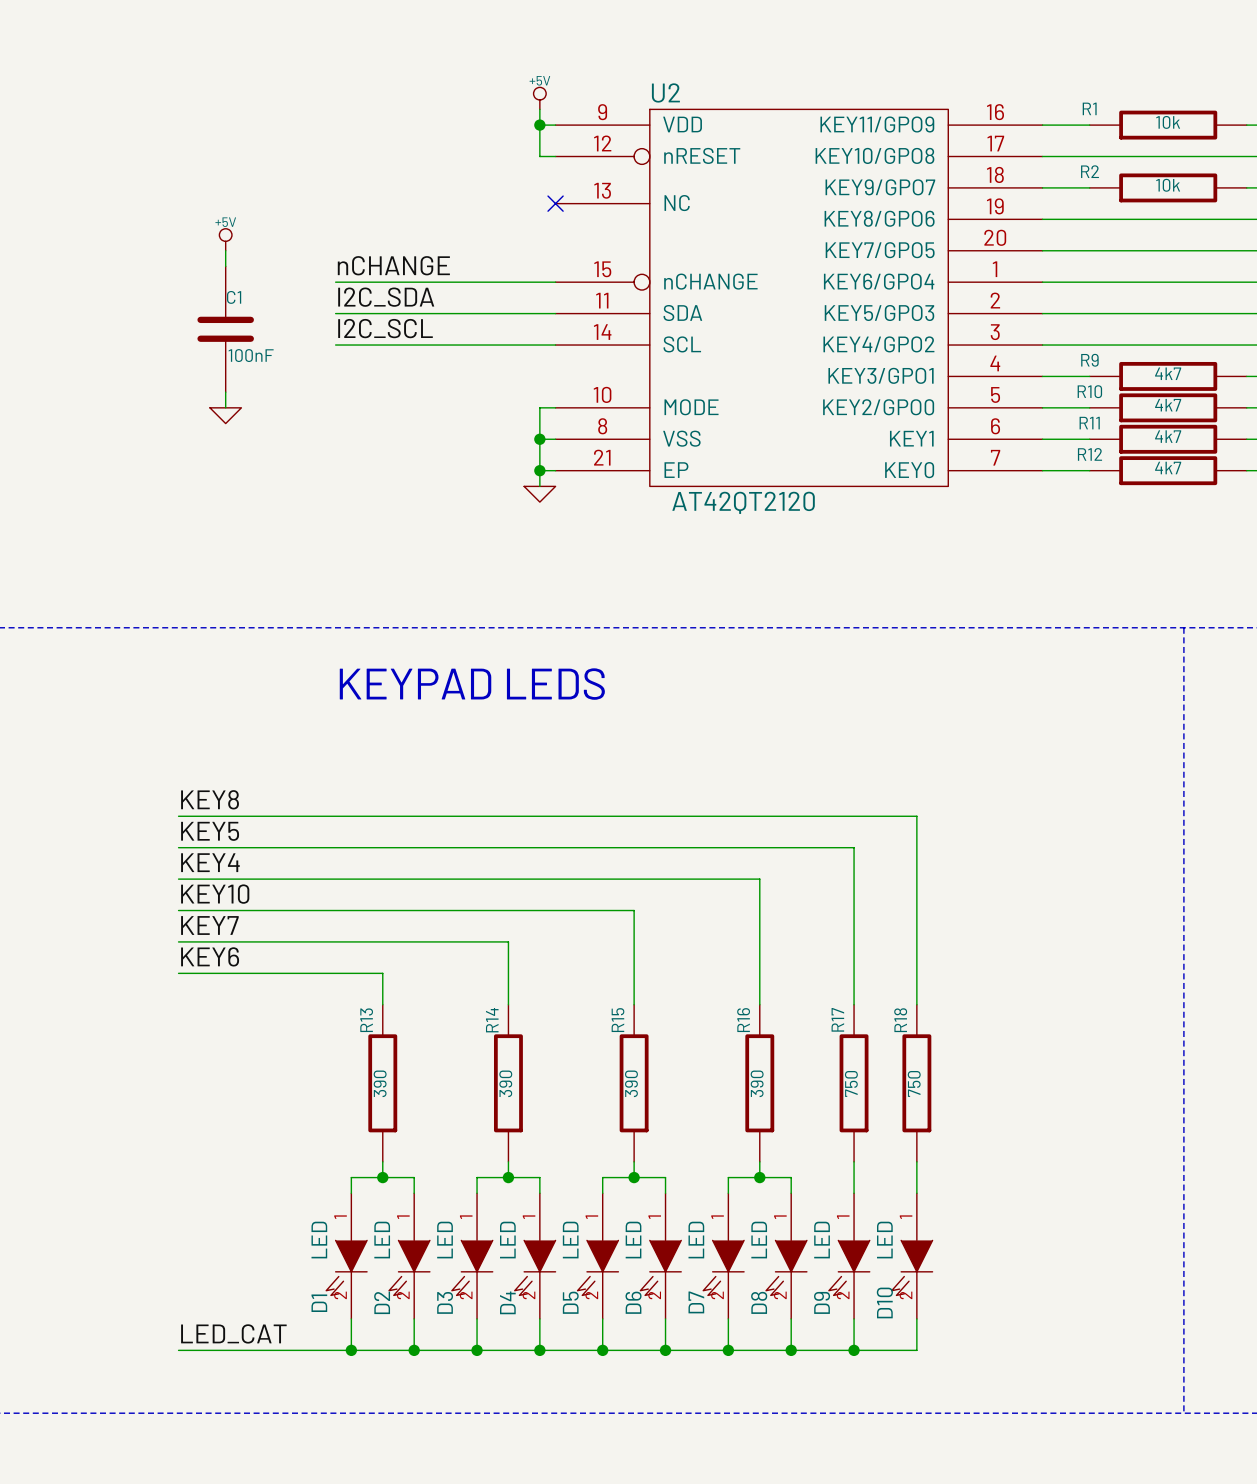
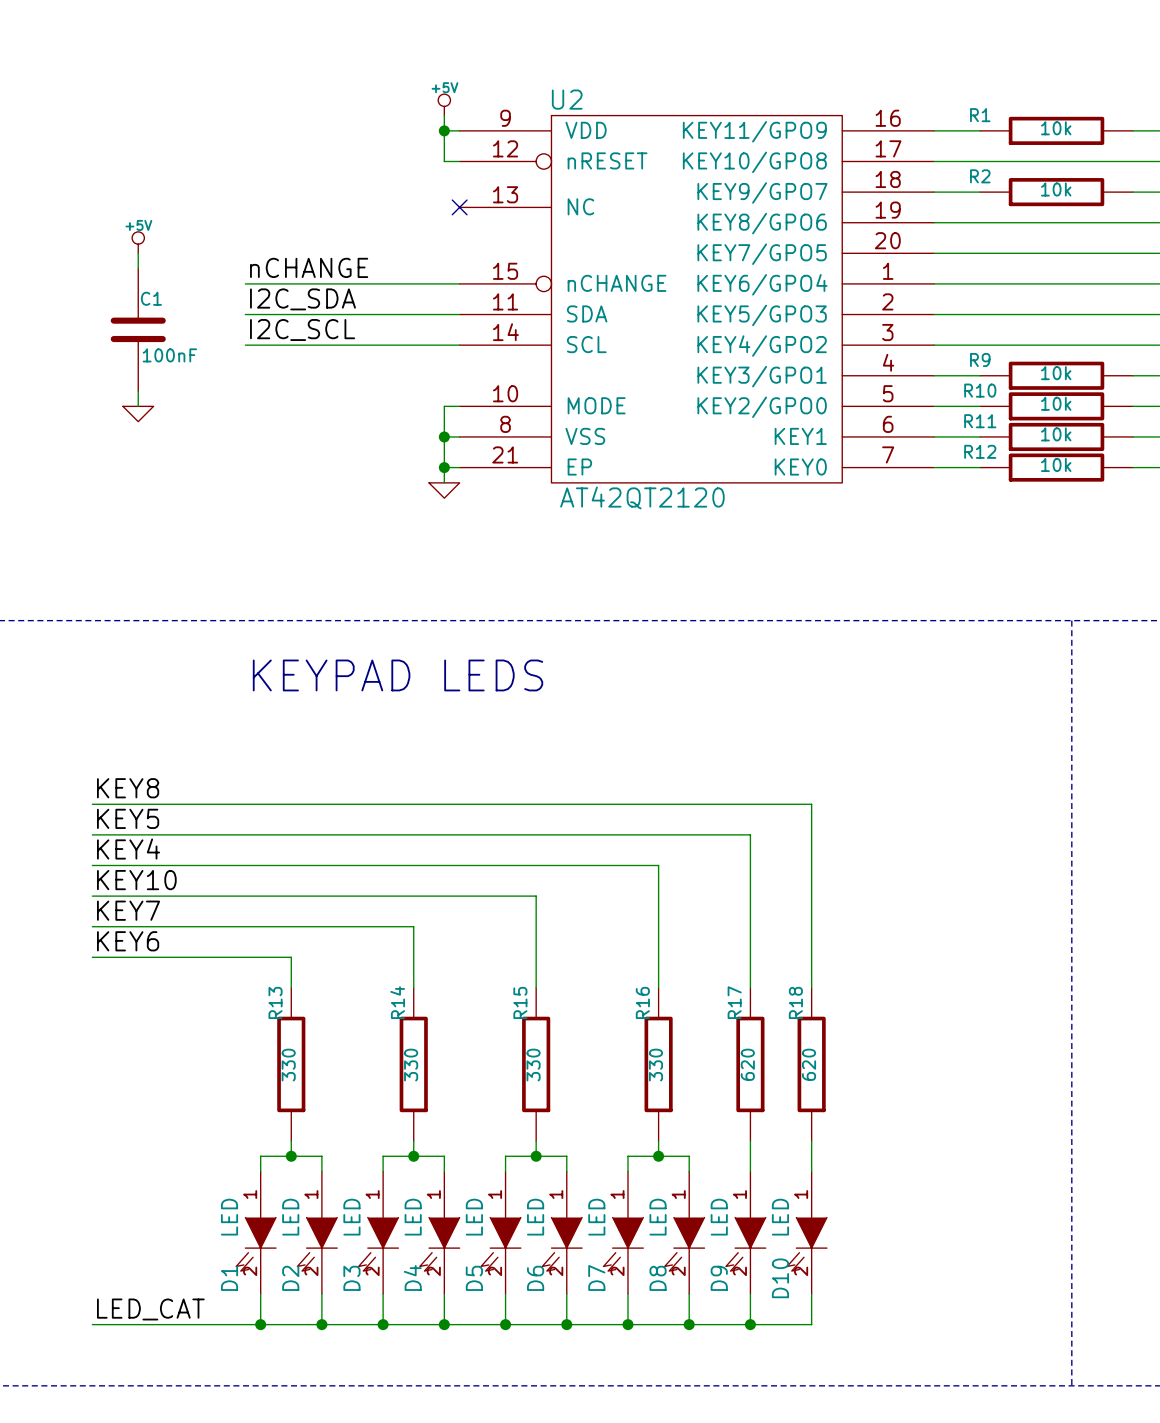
R9 value: 4k7 (1168, 373) -> 10k (1056, 373)
R10 value: 4k7 (1168, 405) -> 10k (1056, 403)
R11 value: 4k7 (1168, 436) -> 10k (1056, 434)
R12 value: 4k7 (1168, 468) -> 10k (1056, 464)
R13 value: 390 (380, 1083) -> 330 (288, 1065)
R14 value: 390 (505, 1083) -> 330 (411, 1065)
R15 value: 390 (631, 1083) -> 330 (533, 1065)
R16 value: 390 (757, 1083) -> 330 (656, 1065)
R17 value: 750 (851, 1083) -> 620 (747, 1064)
R18 value: 750 (914, 1083) -> 620 (809, 1064)

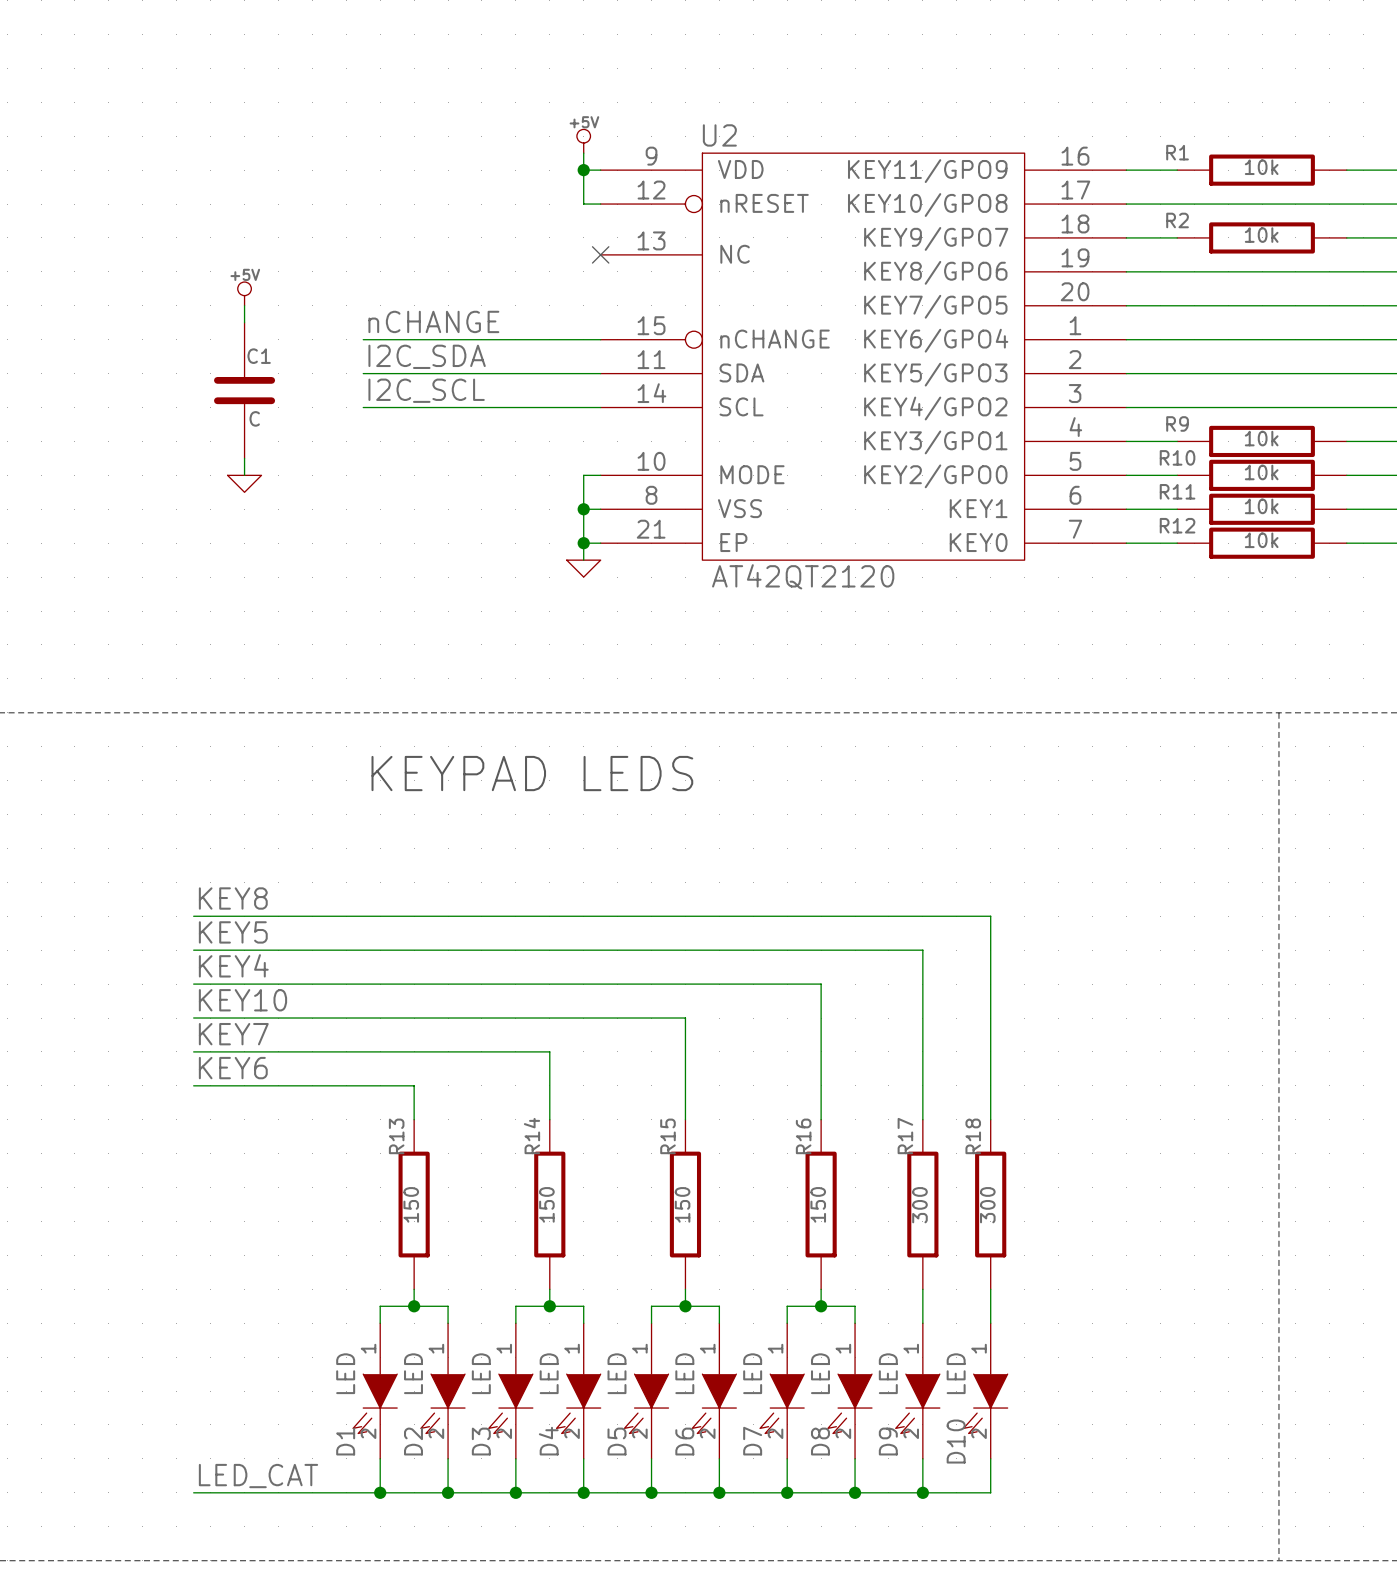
C1 value: 100nF (169, 355) -> C (254, 418)
R17 value: 620 (747, 1064) -> 300 (919, 1205)
R18 value: 620 (809, 1064) -> 300 (987, 1205)
R13 value: 330 (288, 1065) -> 150 (411, 1204)
R14 value: 330 (411, 1065) -> 150 (546, 1204)
R15 value: 330 (533, 1065) -> 150 (682, 1204)
R16 value: 330 (656, 1065) -> 150 (818, 1204)

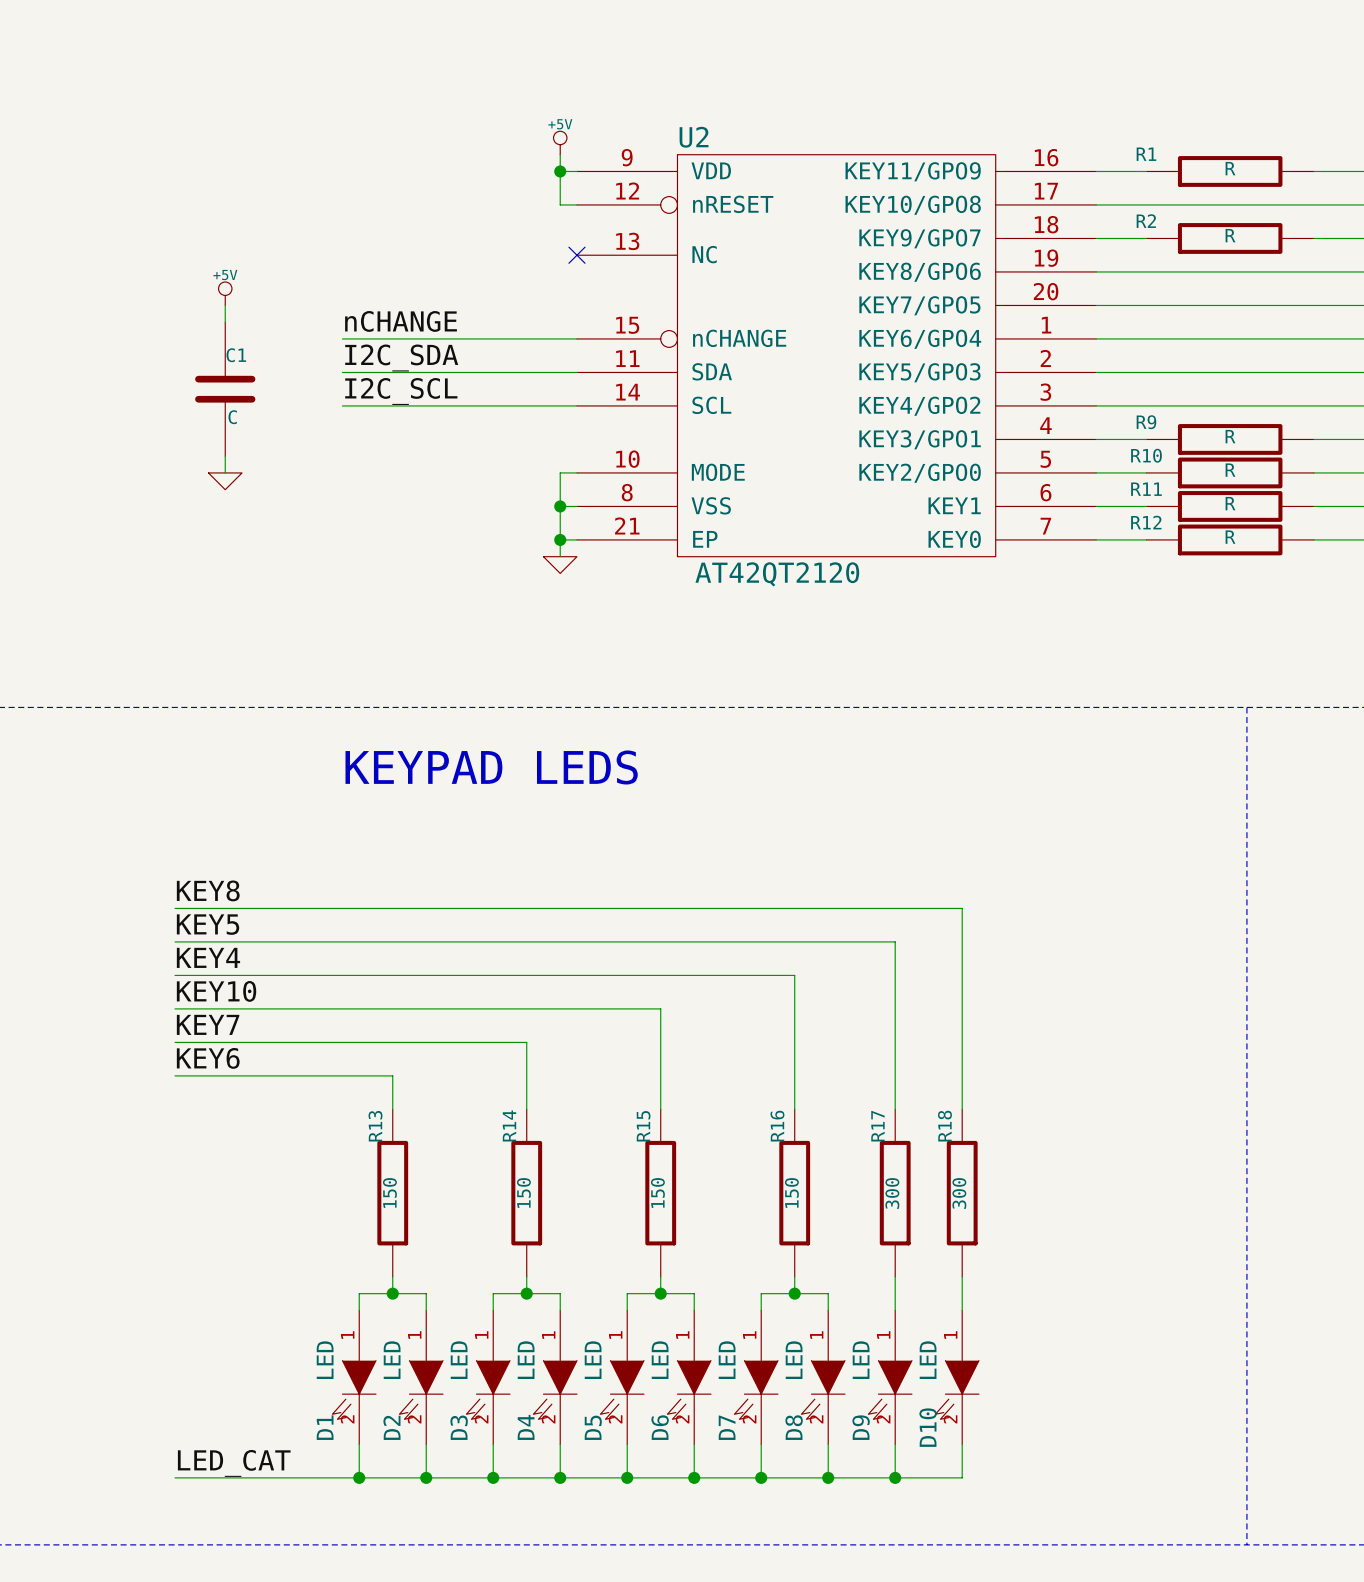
R1 value: 10k (1261, 167) -> R (1230, 168)
R2 value: 10k (1261, 235) -> R (1230, 235)
R9 value: 10k (1261, 438) -> R (1230, 436)
R10 value: 10k (1261, 472) -> R (1230, 470)
R11 value: 10k (1261, 506) -> R (1230, 503)
R12 value: 10k (1261, 540) -> R (1230, 537)

